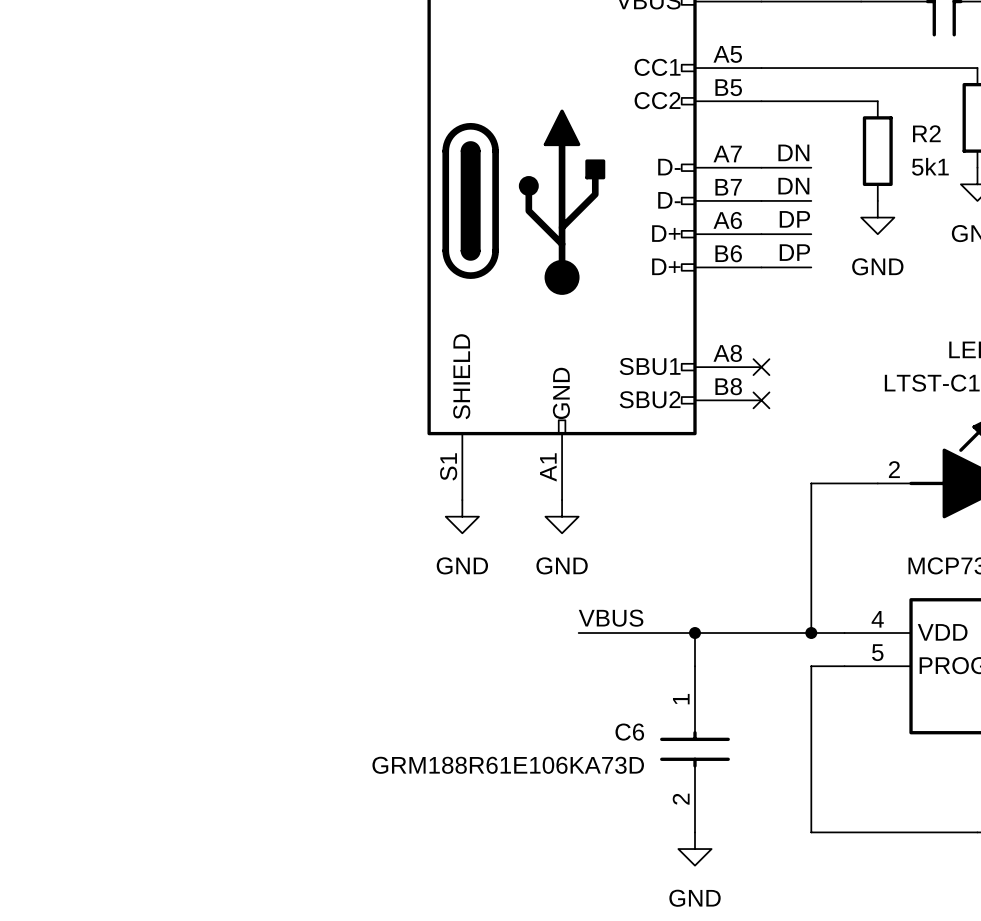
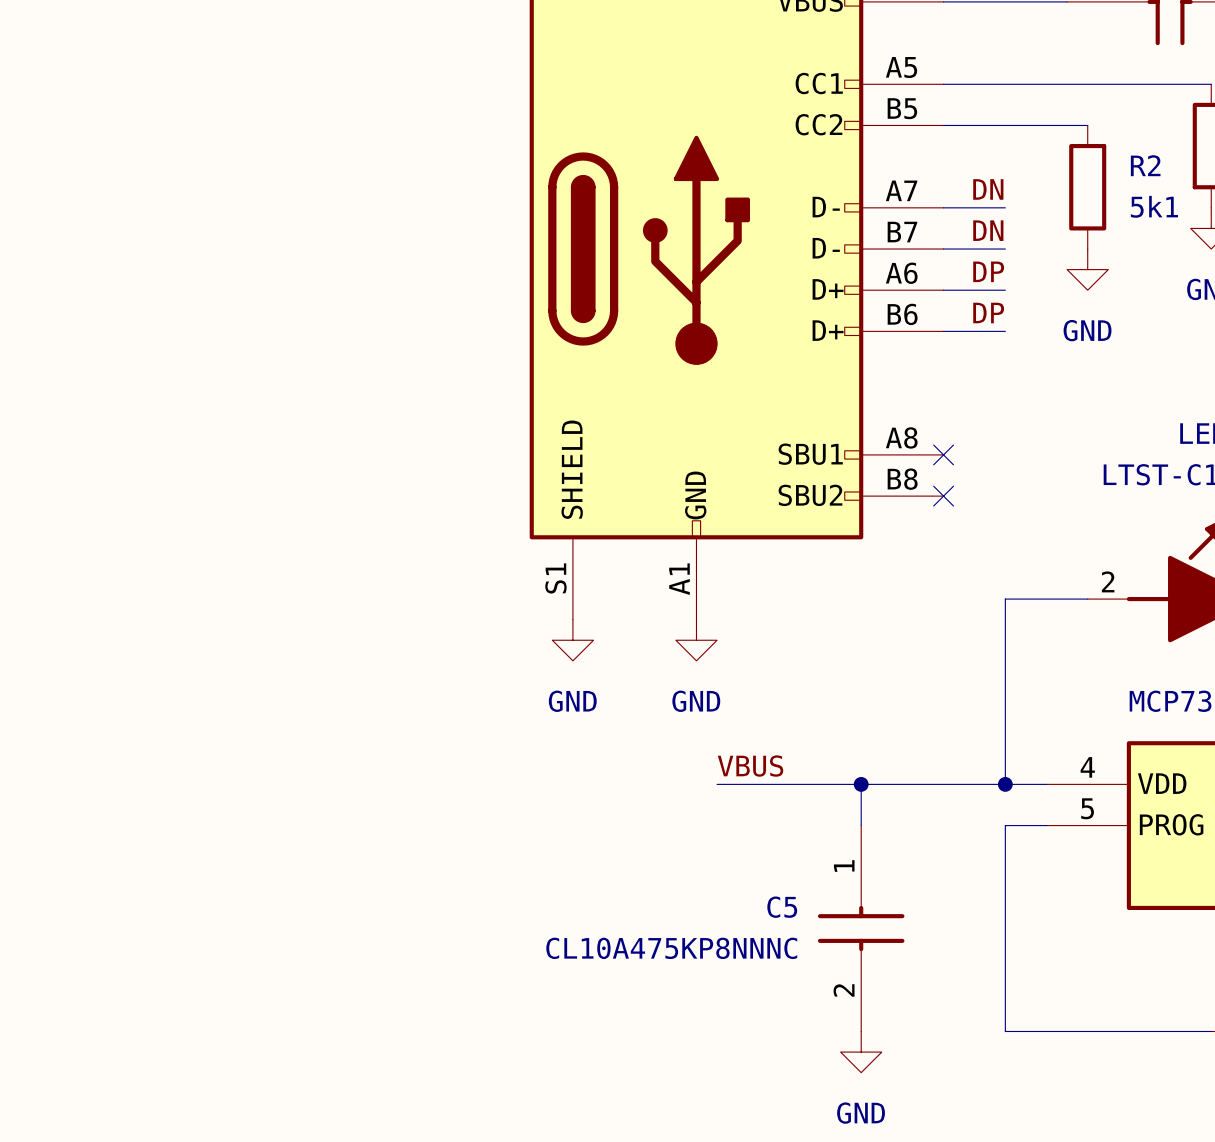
C6 name: C6 (629, 732) -> C5 (782, 907)
C6 value: GRM188R61E106KA73D (508, 765) -> CL10A475KP8NNNC (671, 948)

